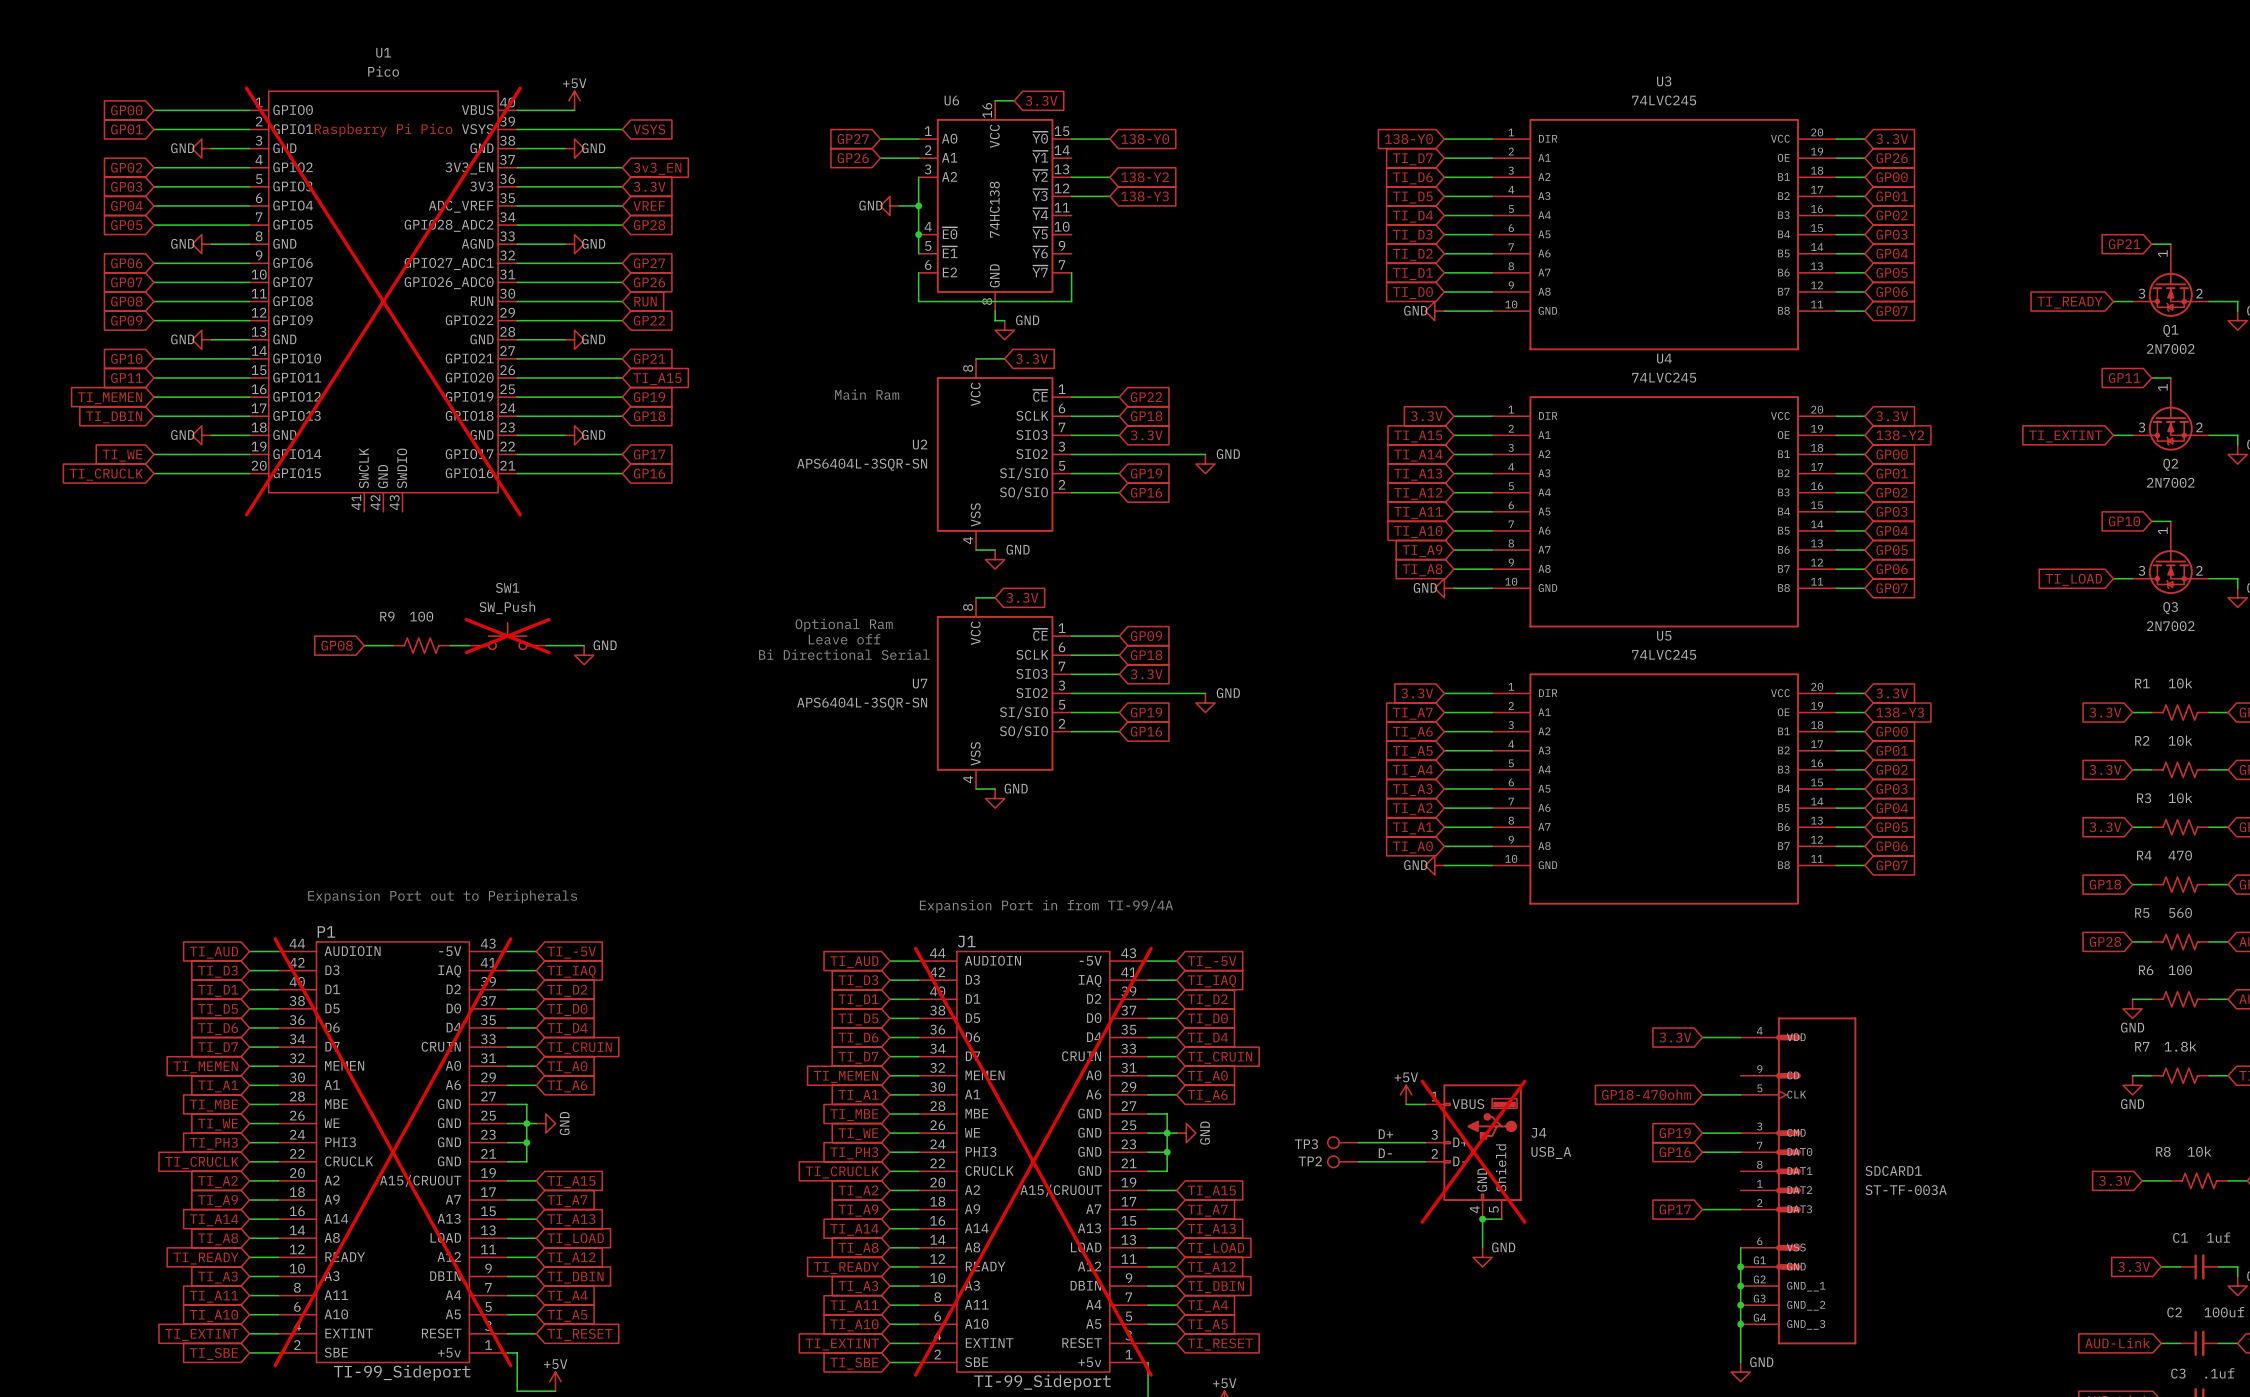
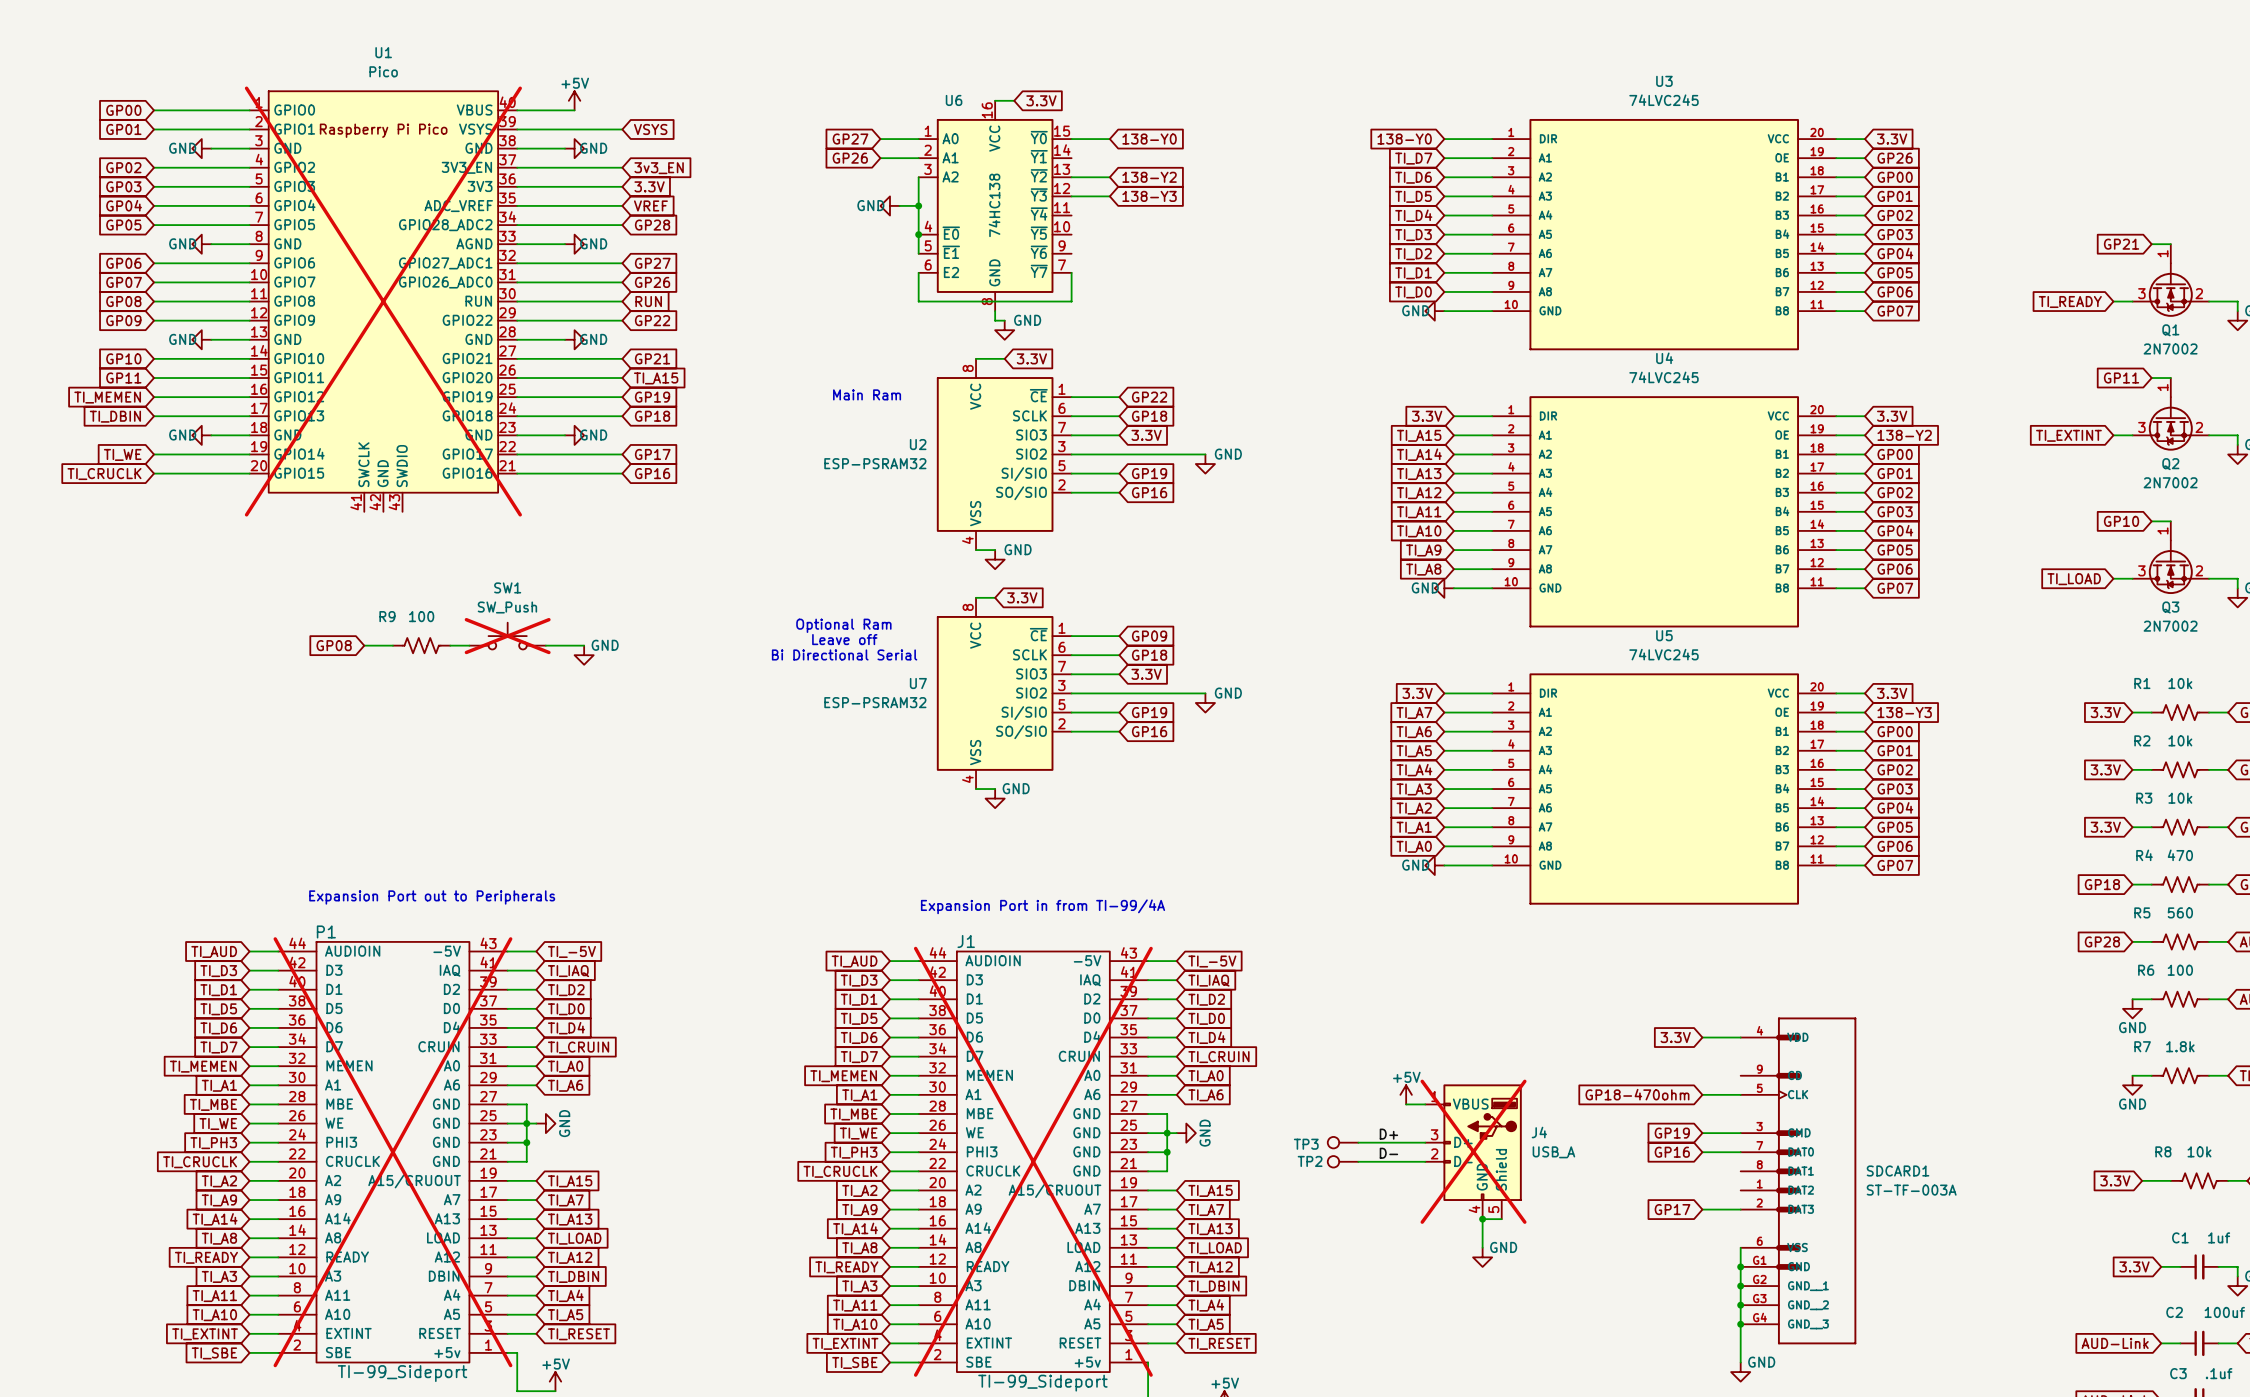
U2 value: APS6404L-3SQR-SN (862, 464) -> ESP-PSRAM32 (875, 463)
U7 value: APS6404L-3SQR-SN (862, 703) -> ESP-PSRAM32 (875, 702)

